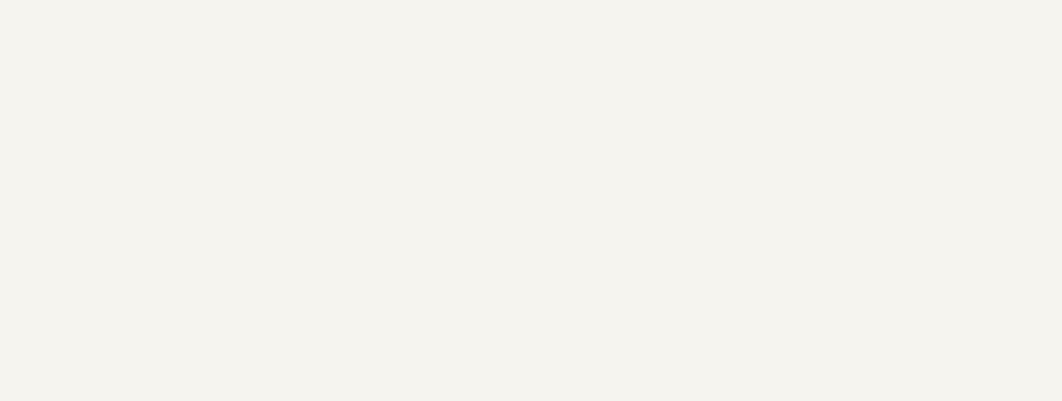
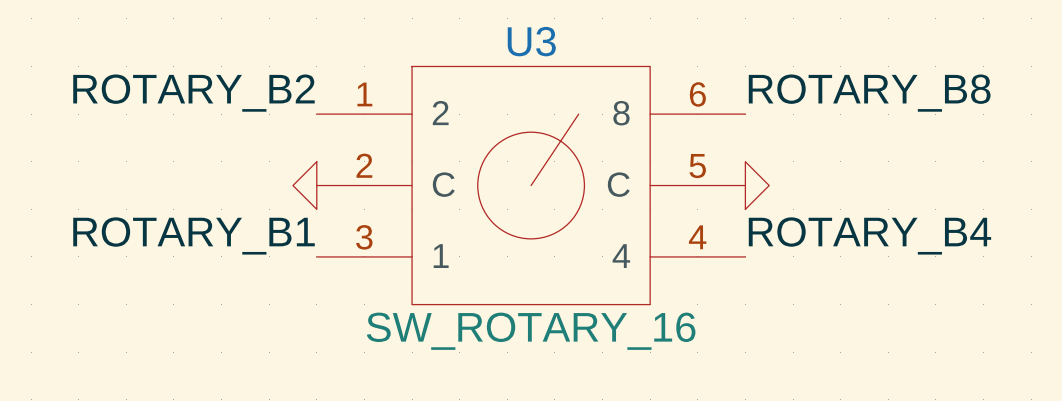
label: none -> ROTARY_B2 (193, 93)
label: none -> ROTARY_B8 (869, 93)
power symbol: none -> (304, 185)
U3: none -> SW_ROTARY_16 (531, 185)
power symbol: none -> (757, 185)
label: none -> ROTARY_B1 (193, 235)
label: none -> ROTARY_B4 (869, 235)

